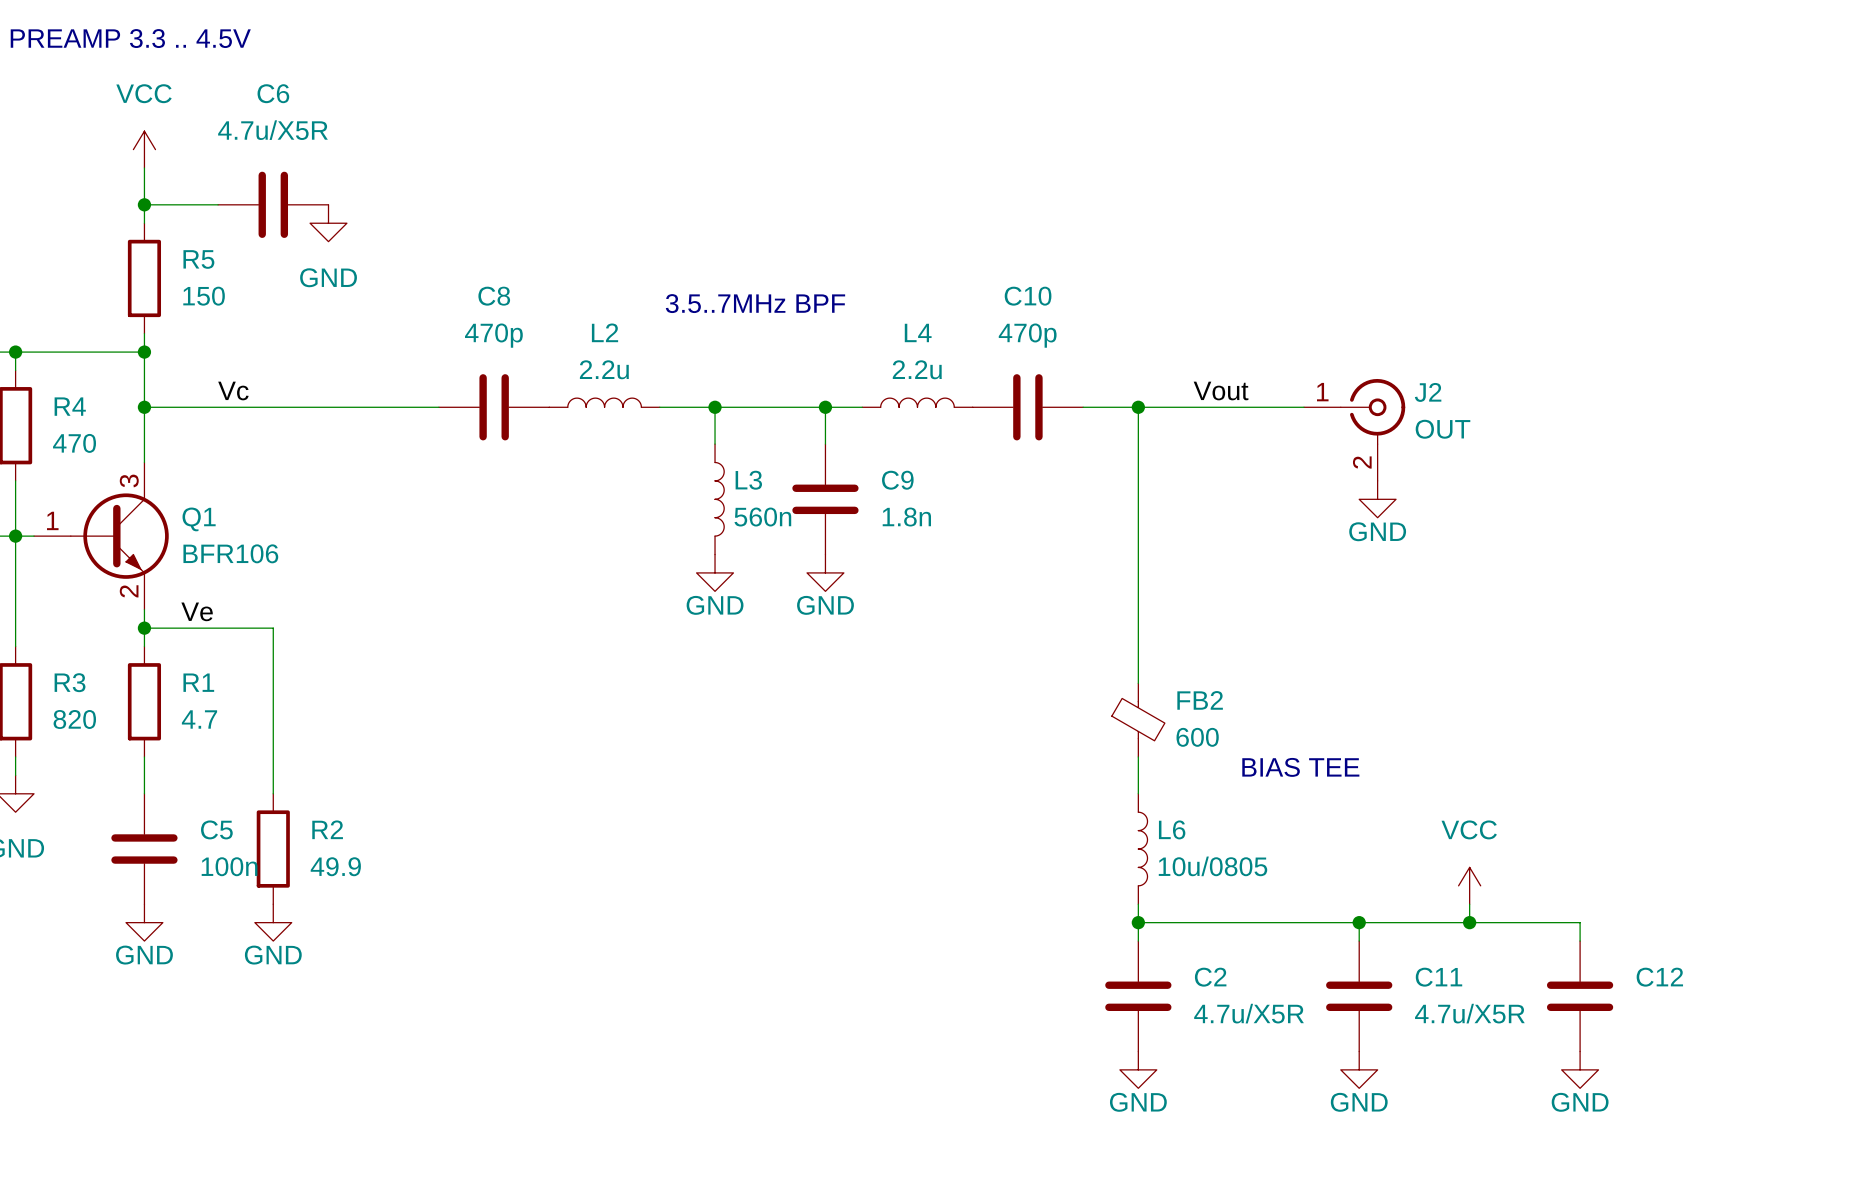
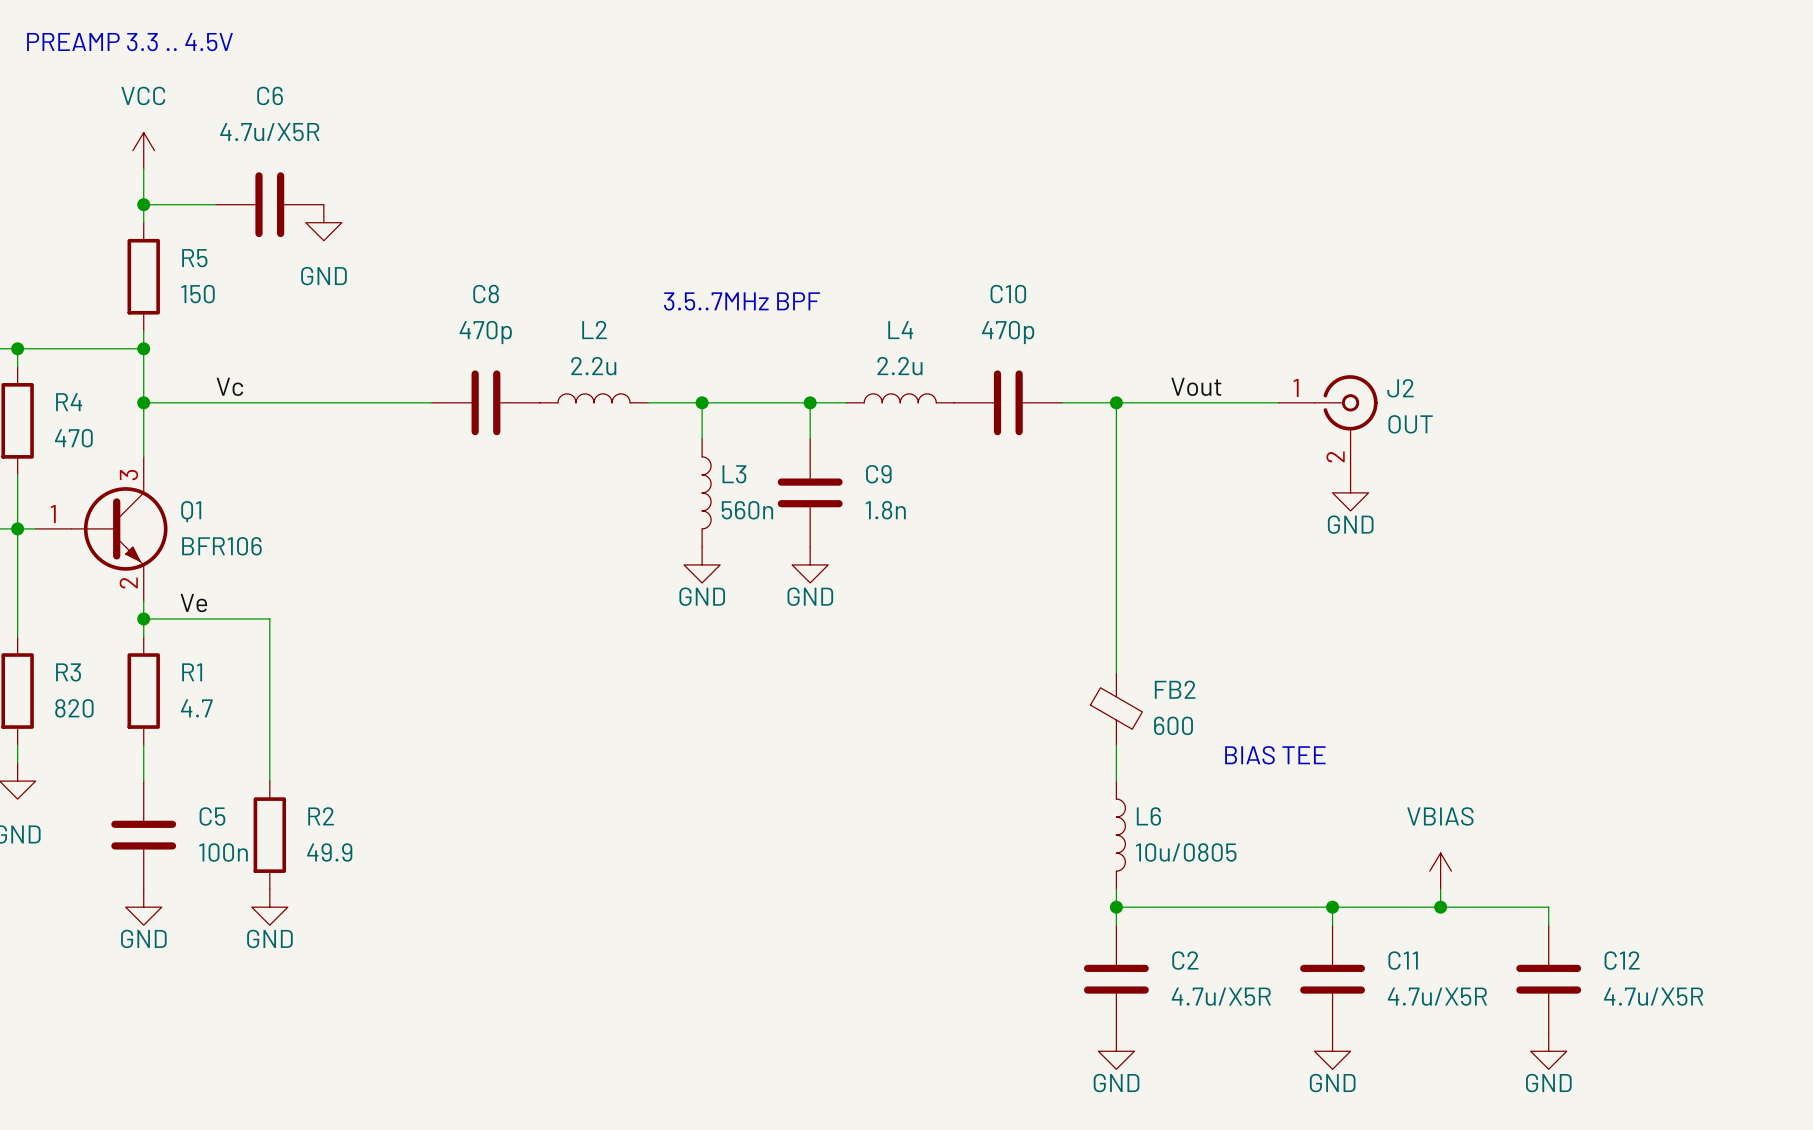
power symbol: VCC (1469, 885) -> VBIAS (1440, 871)
C12 value: none -> 4.7u/X5R (1653, 996)

